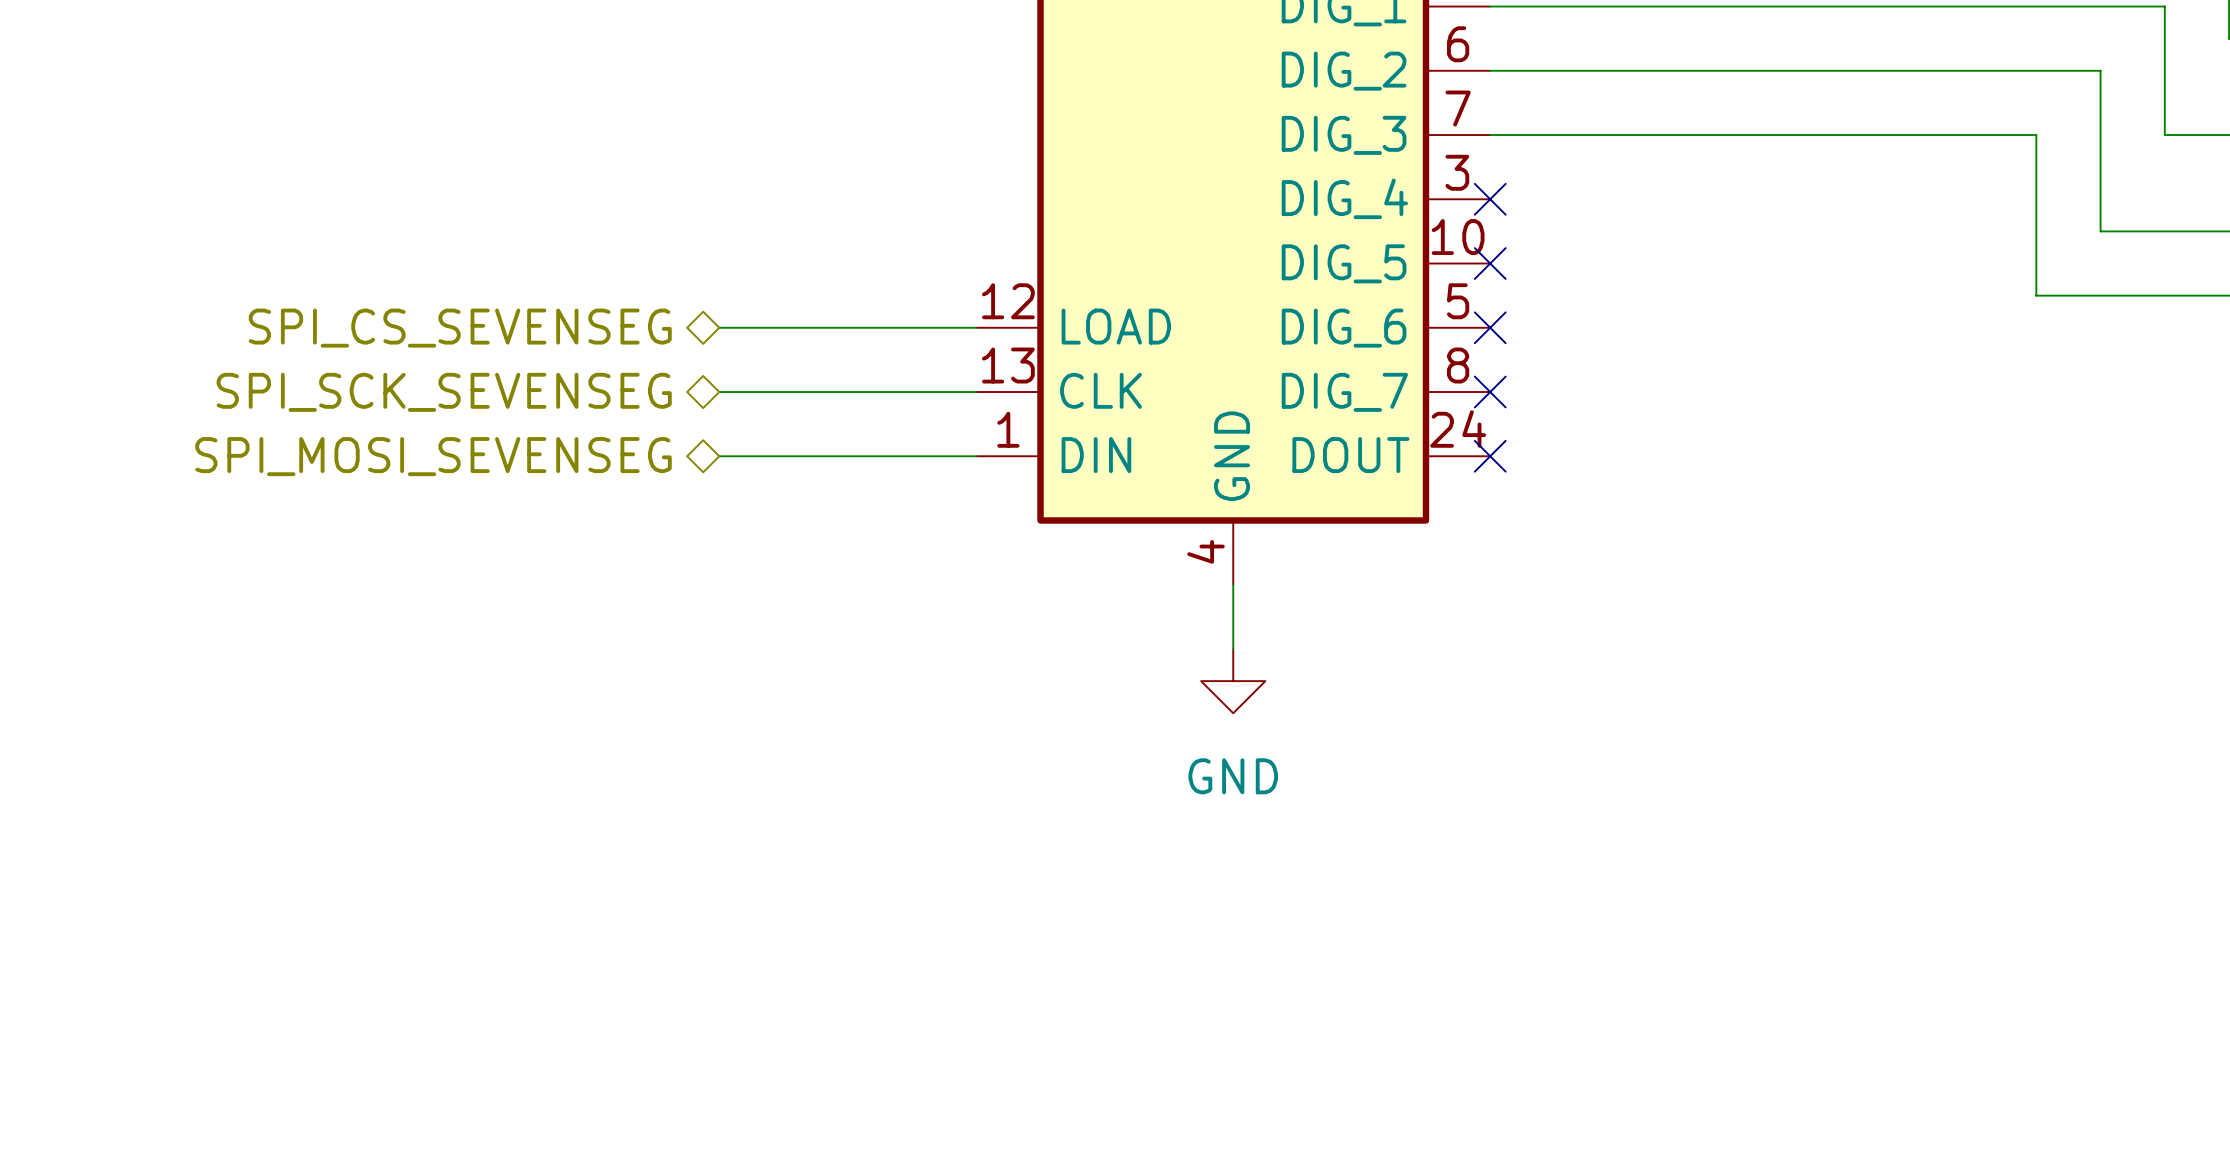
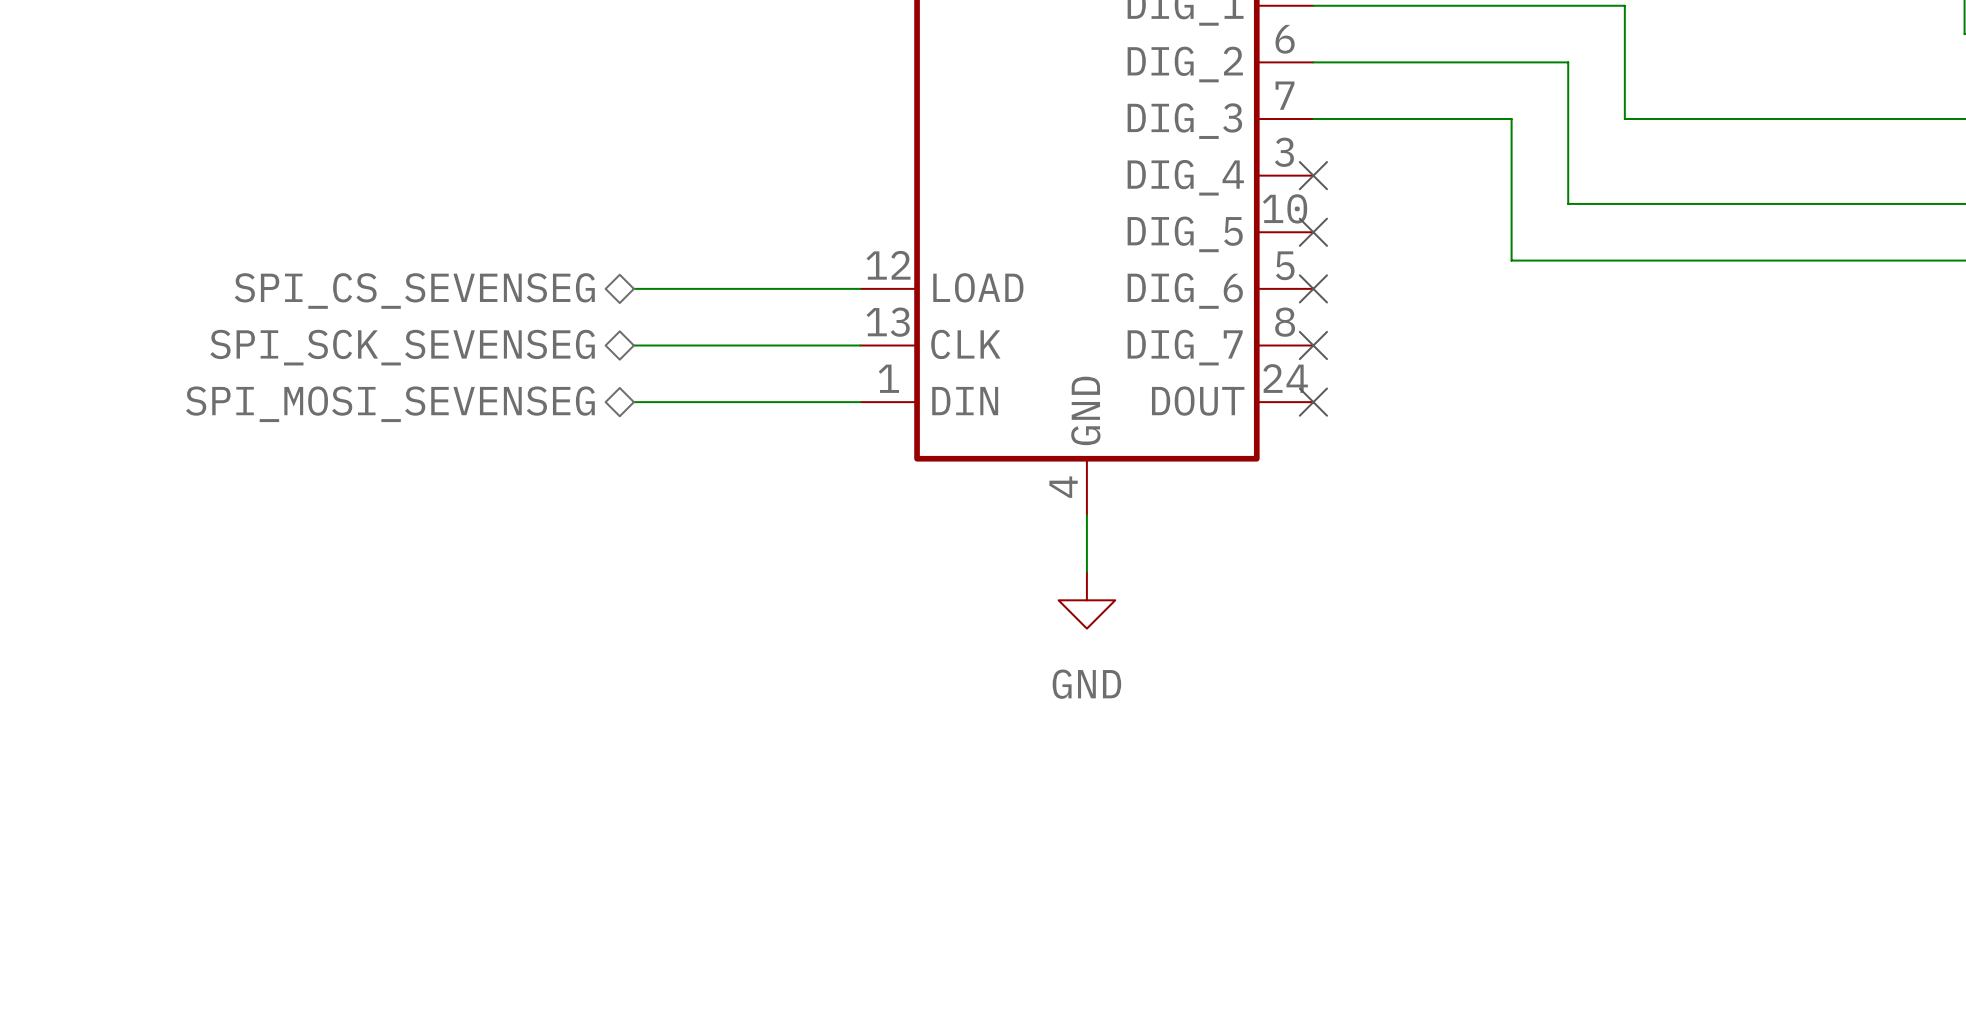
wire: (1843, 6) (2164, 6) (2164, 135) -> none
wire: (1779, 70) (2100, 70) (2100, 231) -> (1568, 62) (1568, 203) (1851, 203)
wire: (1715, 135) (1843, 135) -> (1624, 5) (1624, 119)
wire: none -> (1511, 119) (1511, 260) (1794, 260)
wire: (2036, 135) (2036, 295) -> (1794, 119) (1907, 119)

